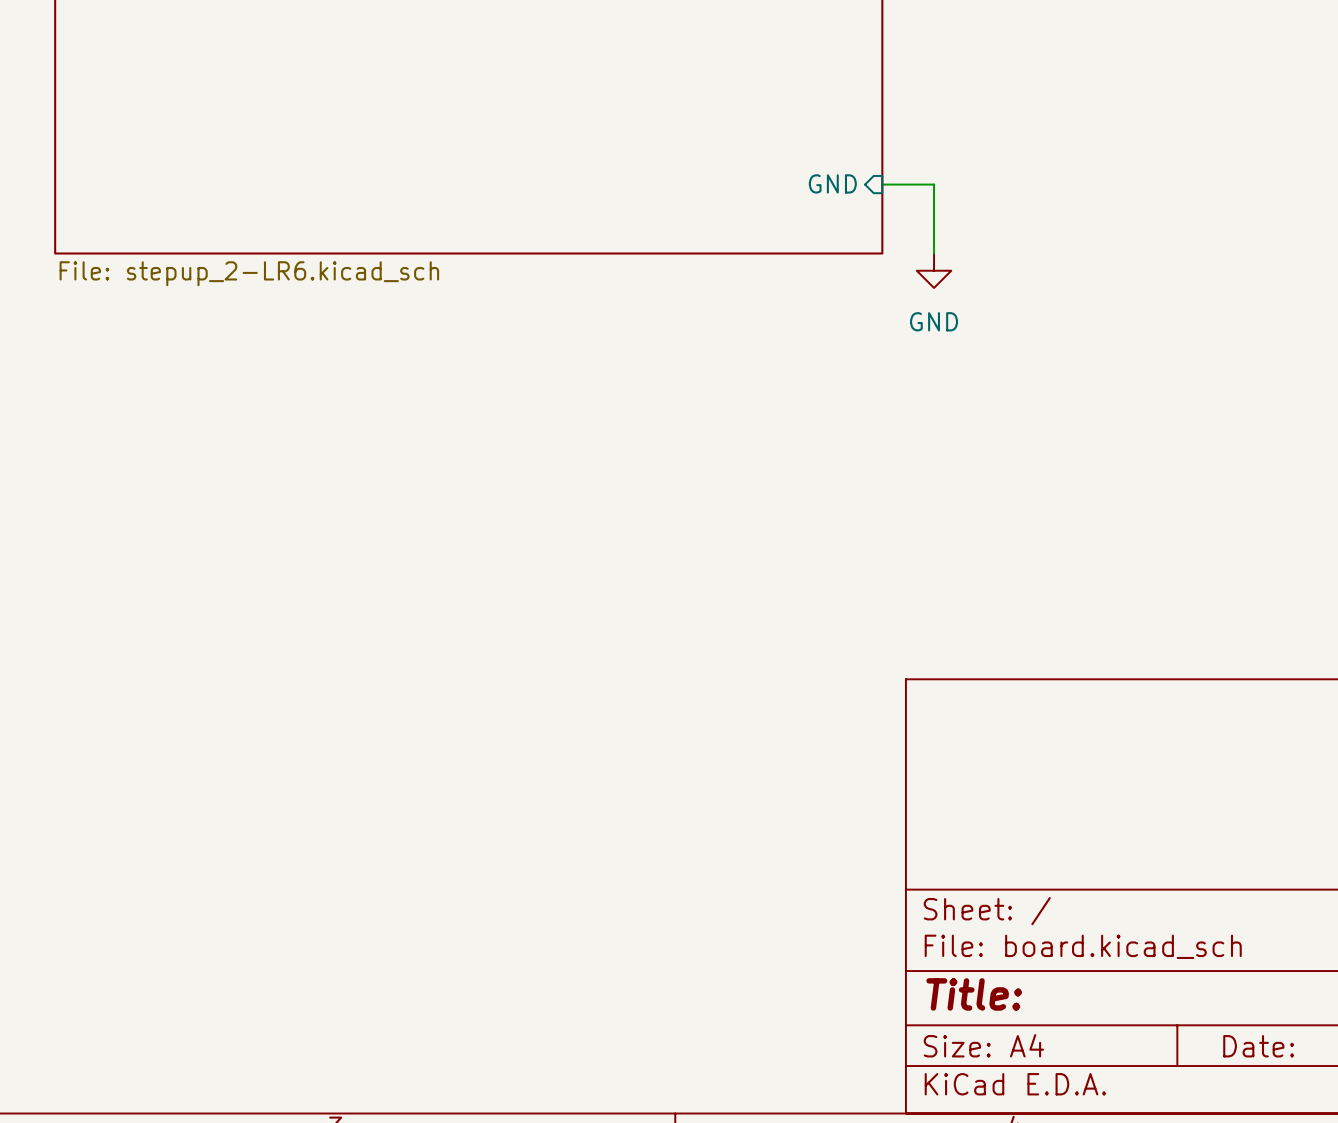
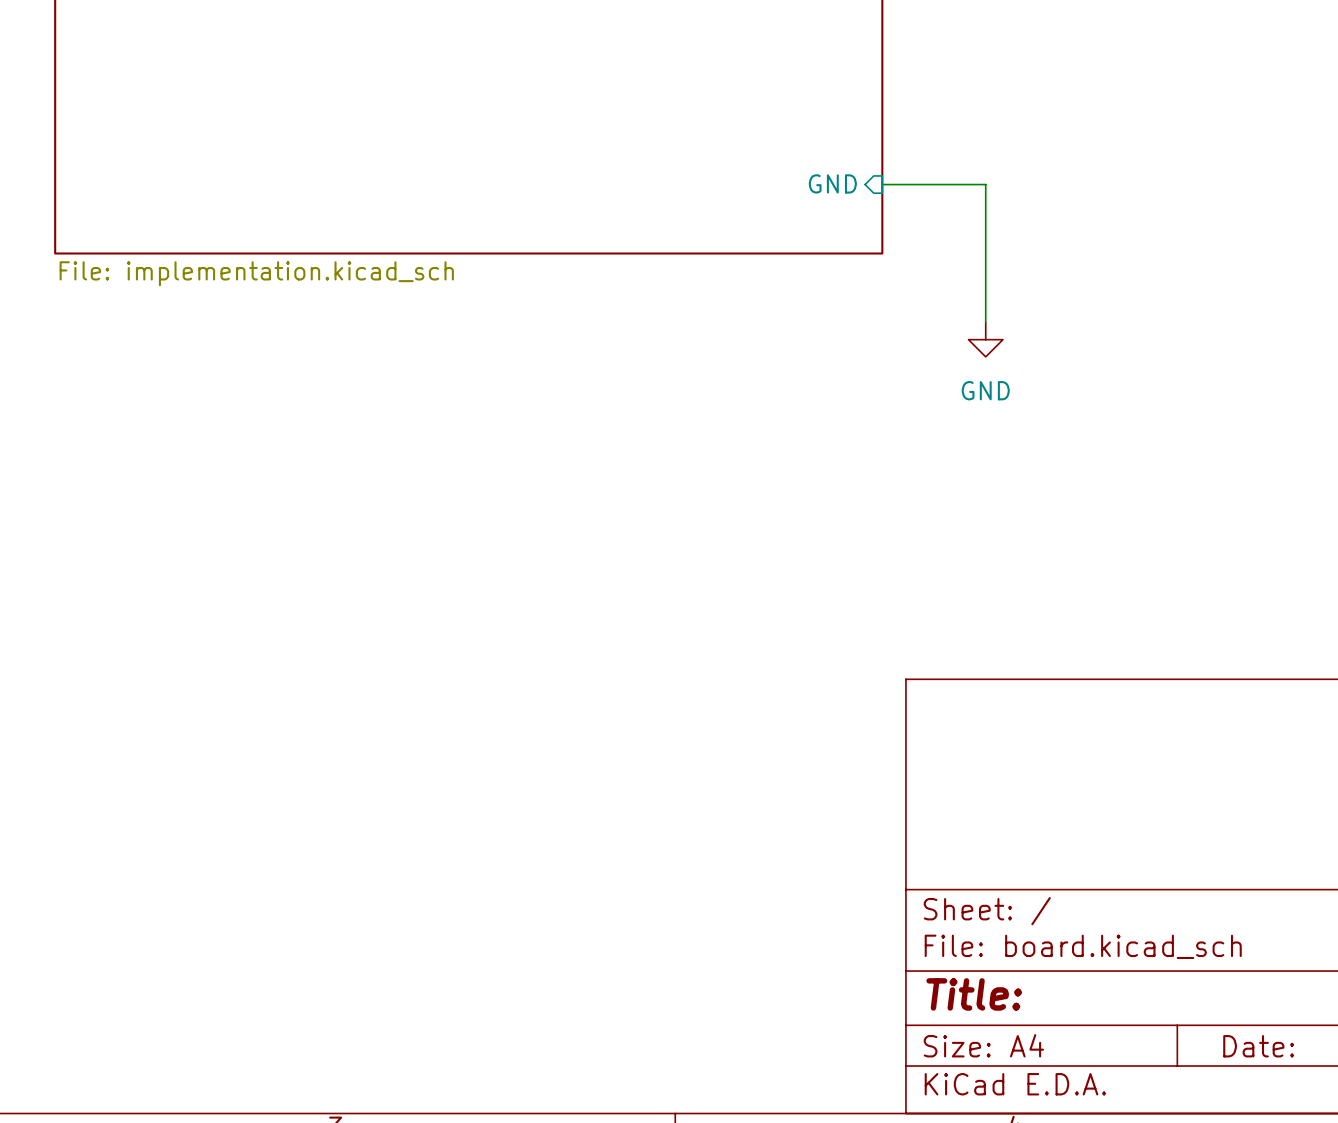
wire: (934, 184) (934, 253) -> (934, 184) (985, 184) (985, 322)
power symbol position: GND (934, 270) -> GND (985, 339)
sheet value: File: stepup_2-LR6.kicad_sch (249, 273) -> File: implementation.kicad_sch (256, 273)

